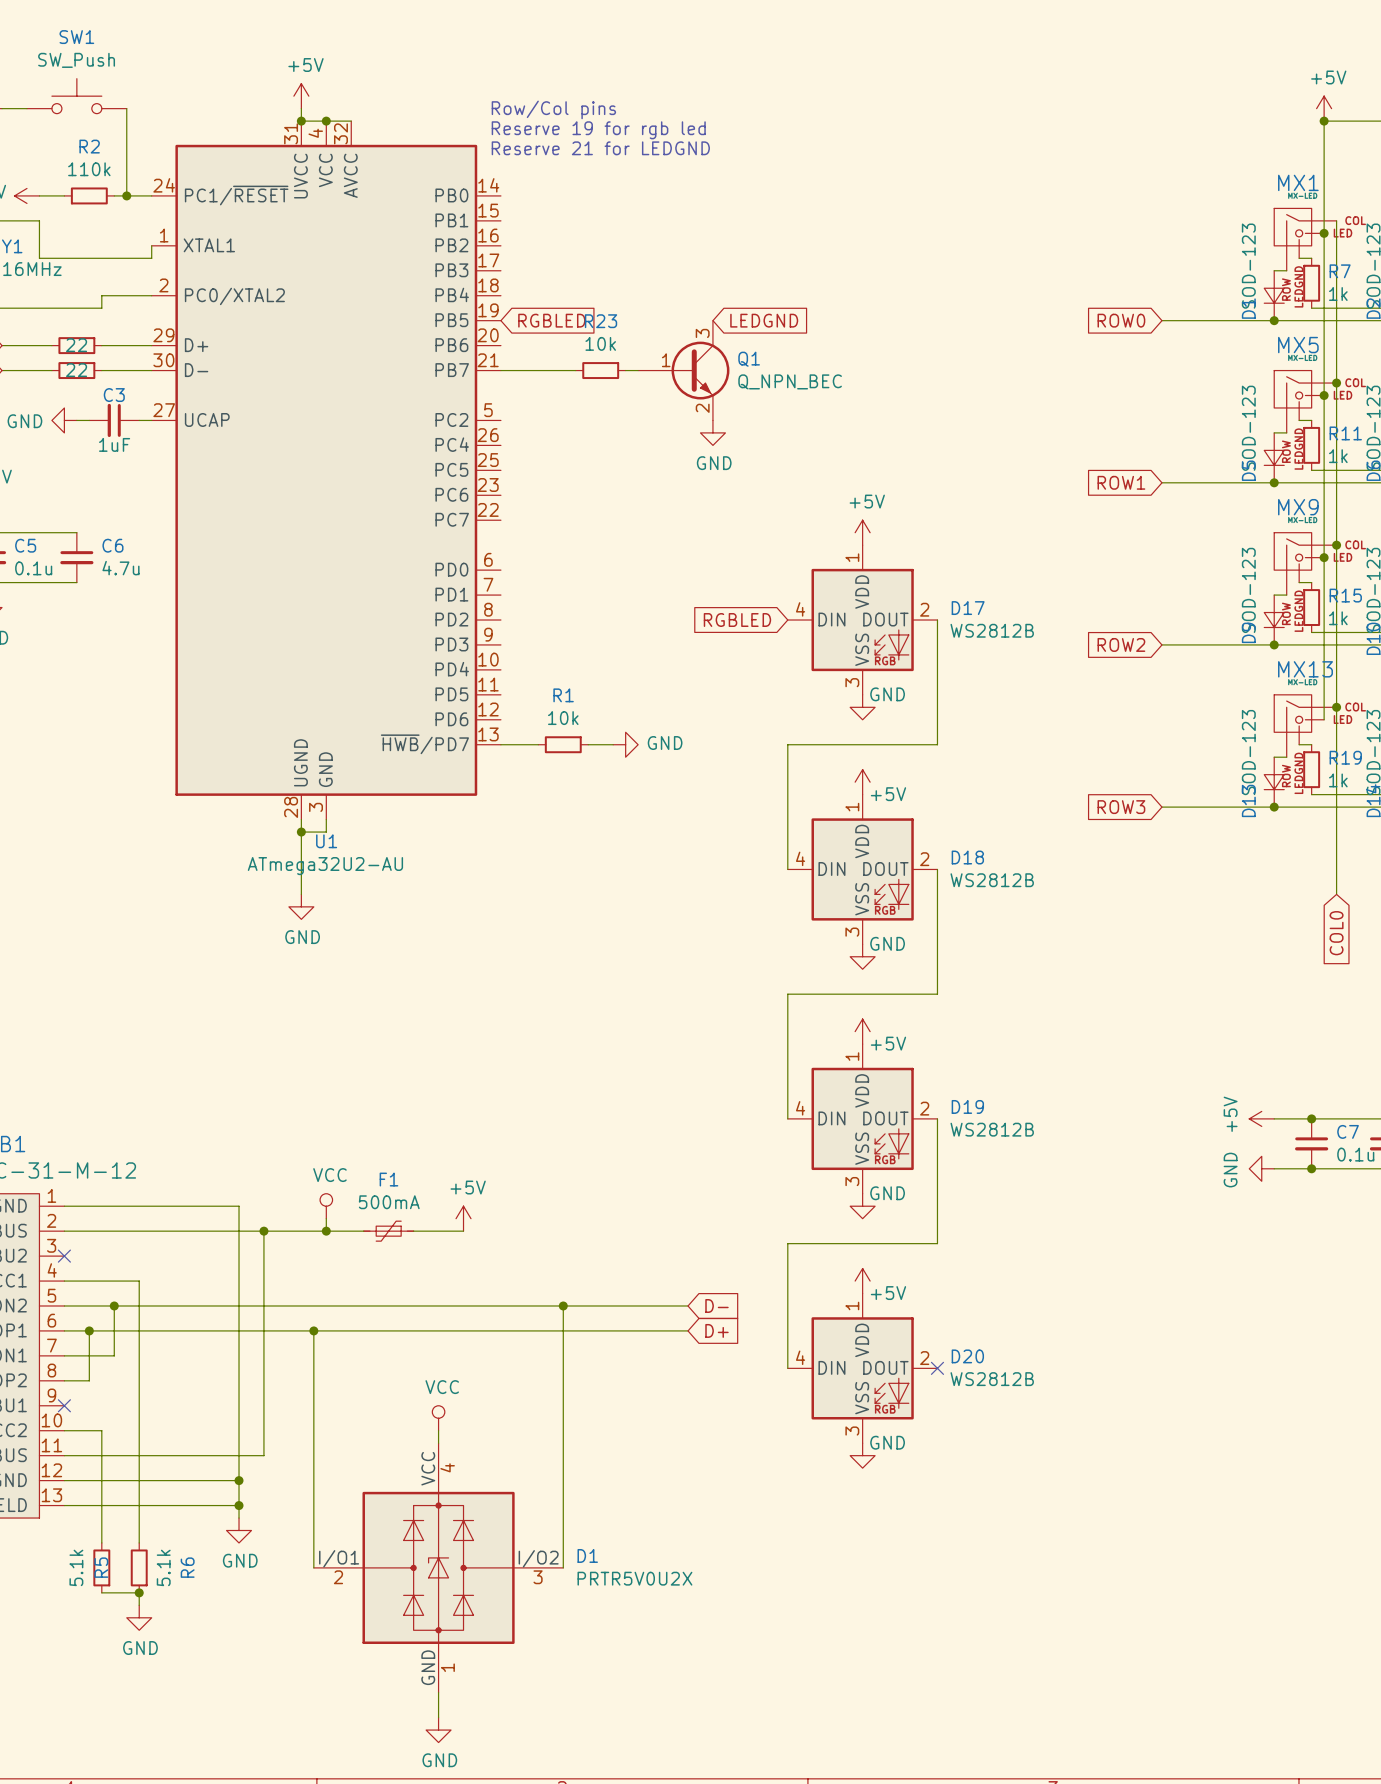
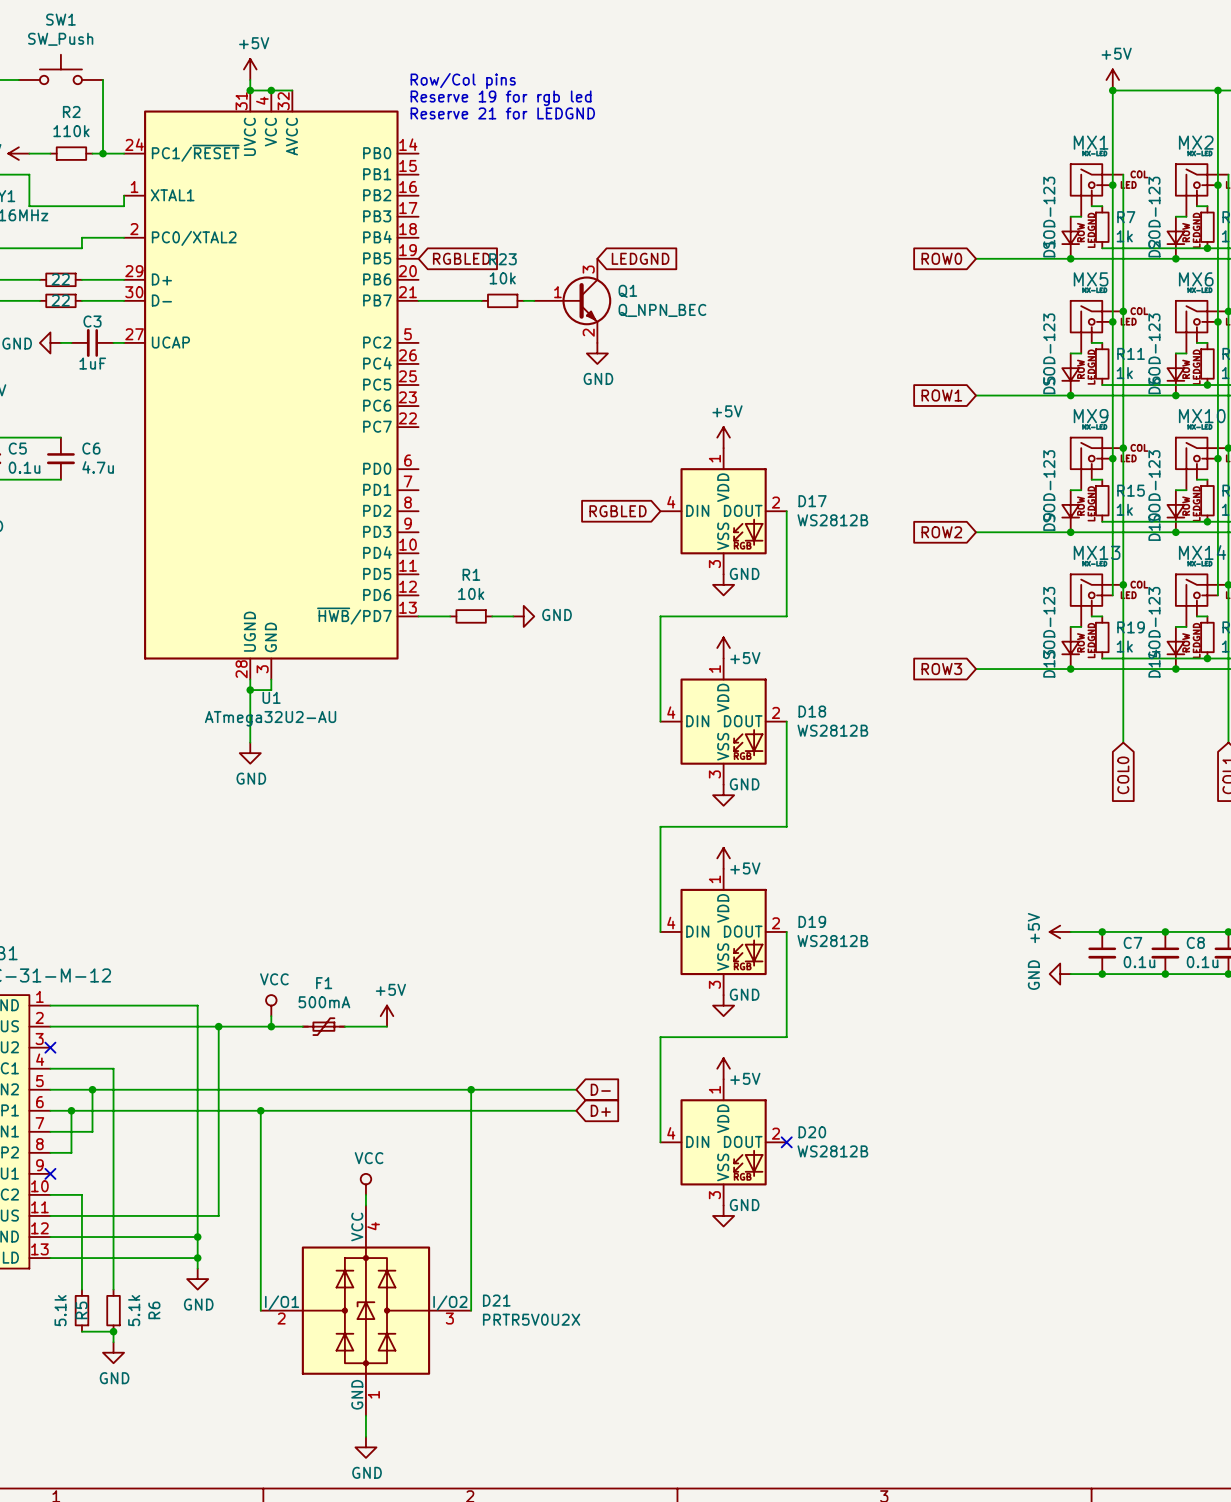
D1 name: D1 (587, 1555) -> D21 (496, 1300)

